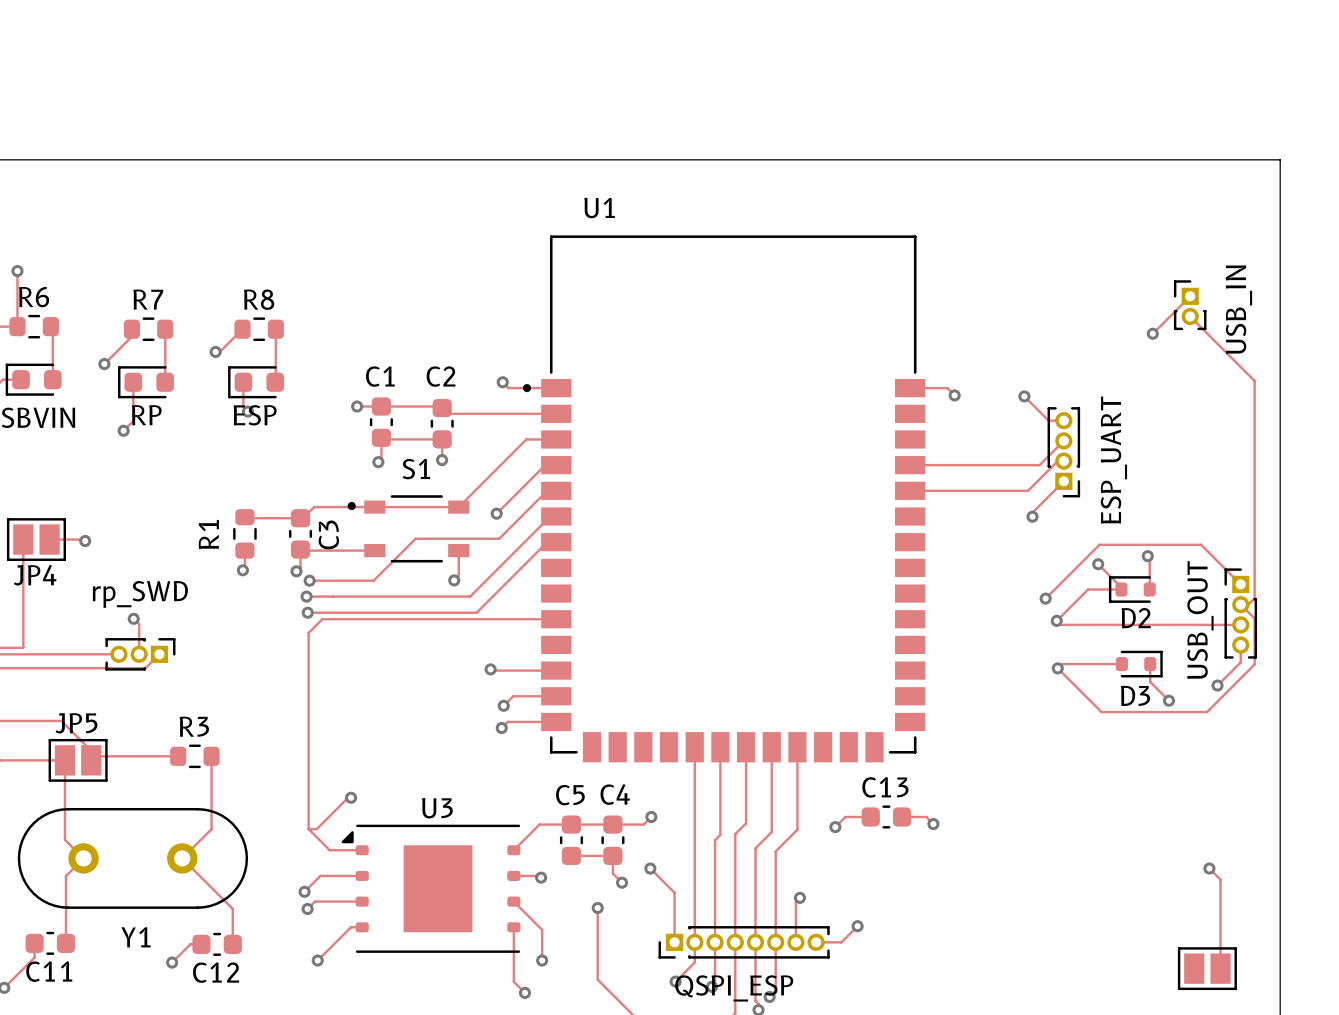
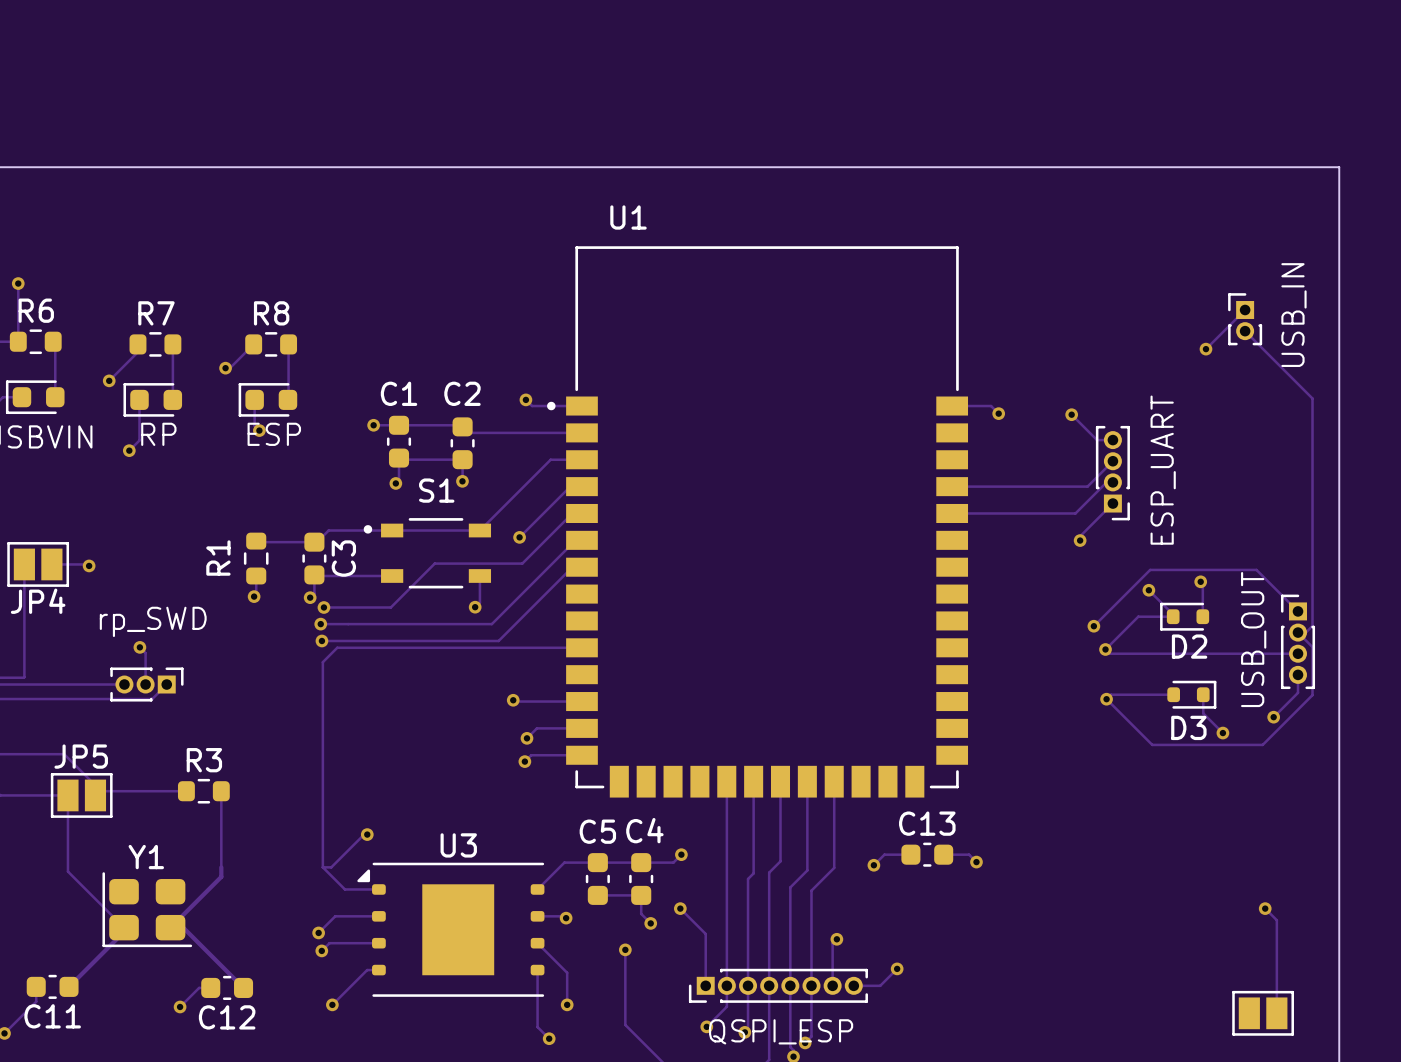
Y1 footprint: [17, 807, 249, 909] -> [102, 872, 193, 948]
track: (211, 829) (182, 858) (232, 908) (232, 944) -> (221, 867) (221, 876) (170, 927) (183, 927) (243, 987)
track: (64, 833) (64, 839) (83, 858) (65, 876) (65, 943) -> (67, 871) (124, 927) (124, 931) (69, 986)
Y1 name position: Y1 (135, 937) -> Y1 (146, 857)

